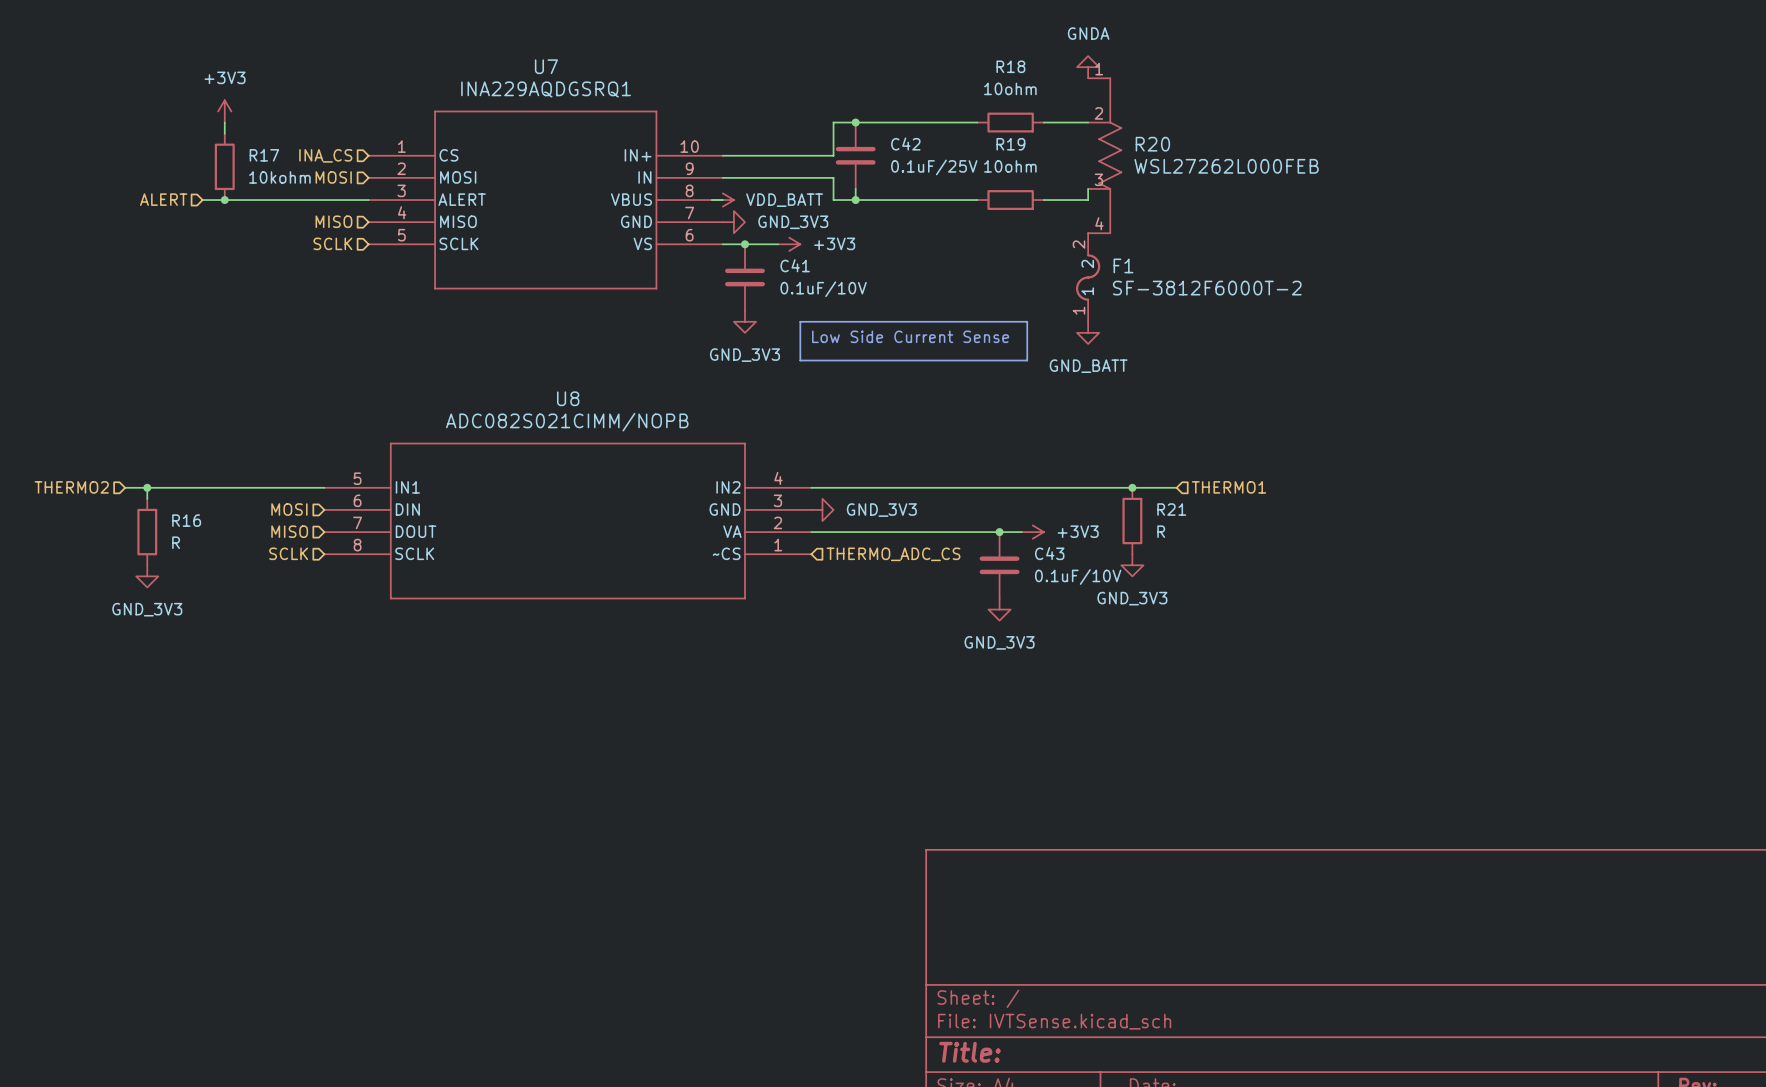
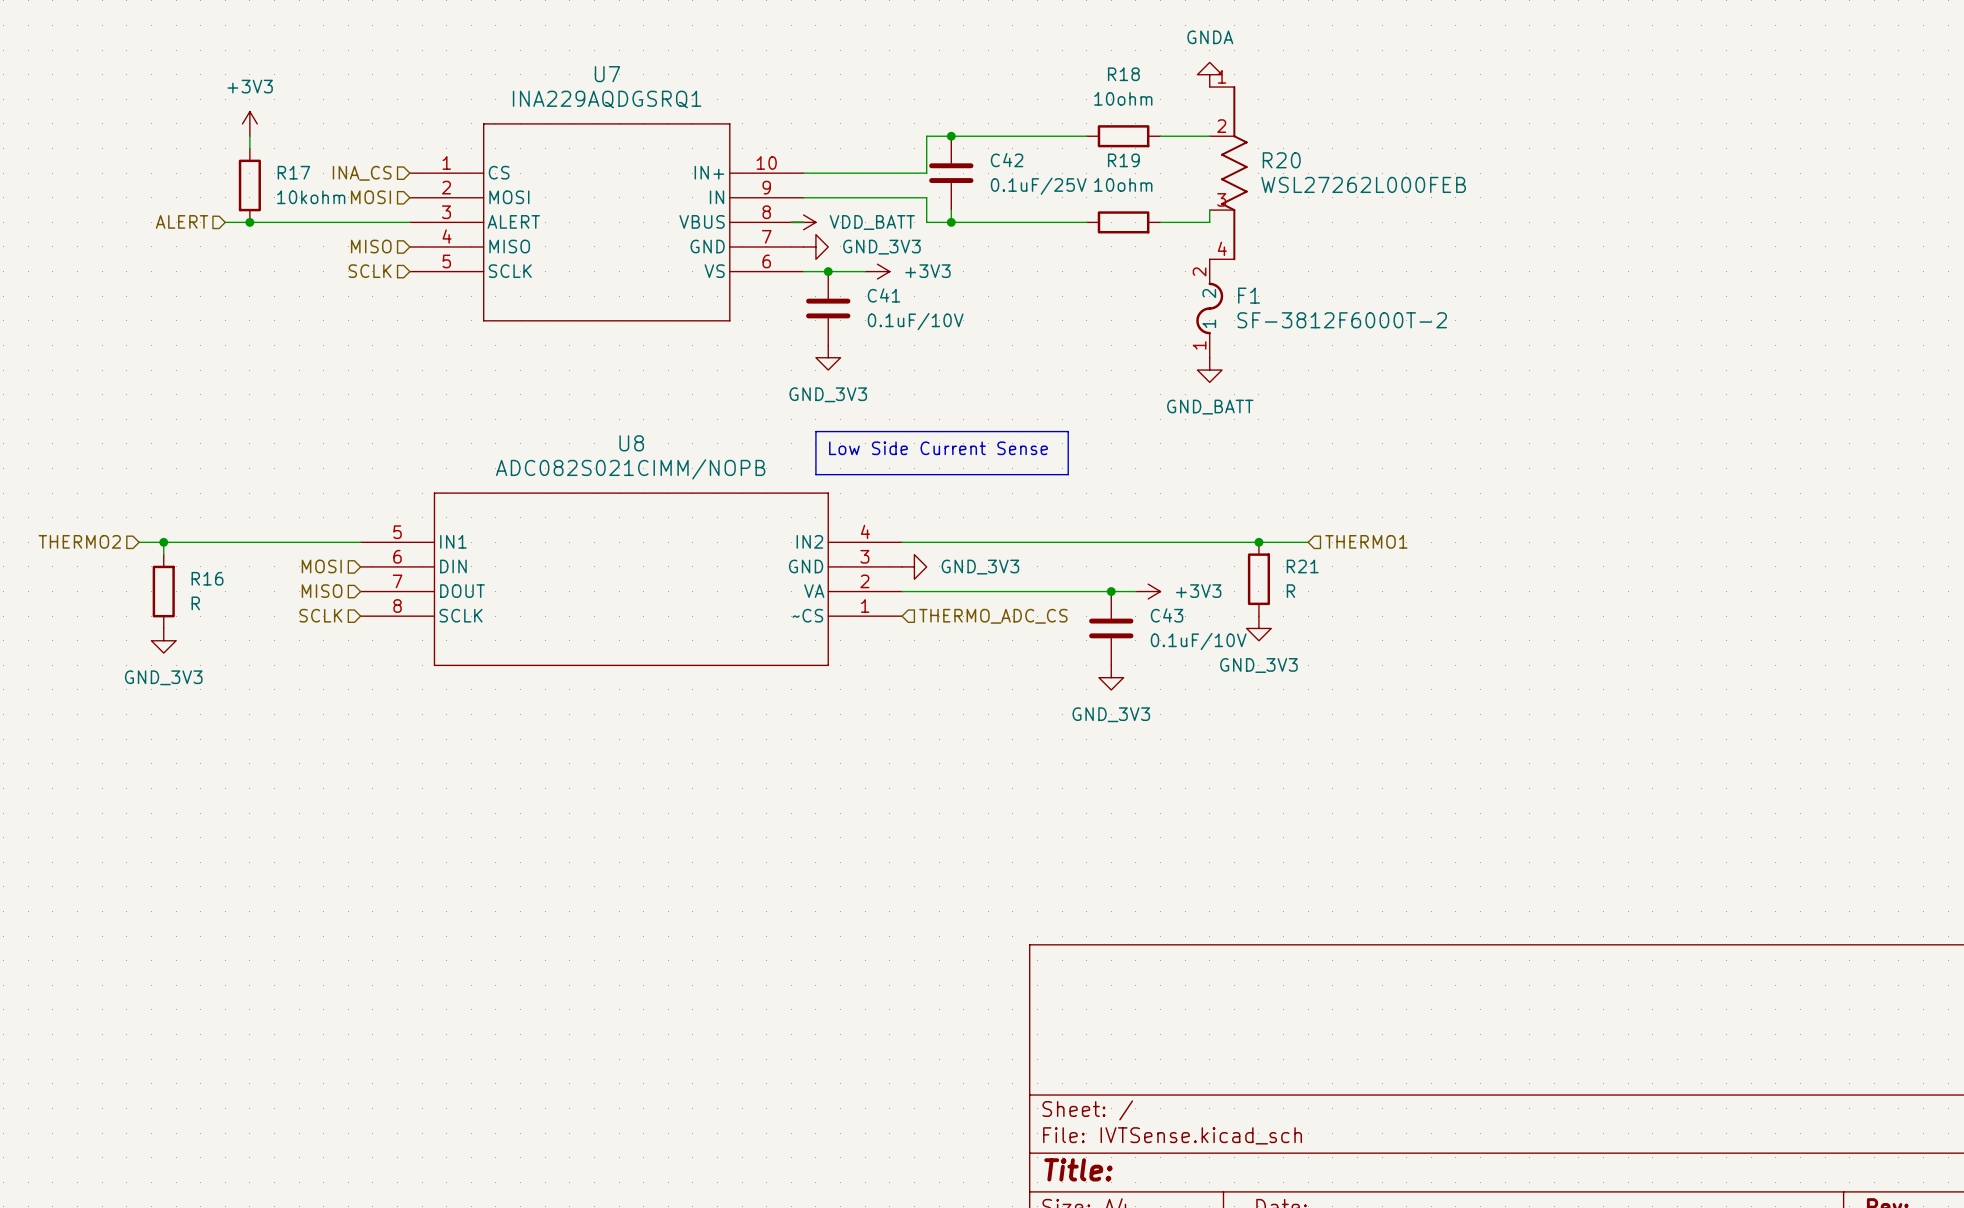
line: (800, 321) (1027, 321) (1027, 360) (800, 360) (800, 321) -> (815, 431) (1068, 431) (1068, 474) (815, 474) (815, 431)
text position: Low Side Current Sense (910, 336) -> Low Side Current Sense (938, 448)

